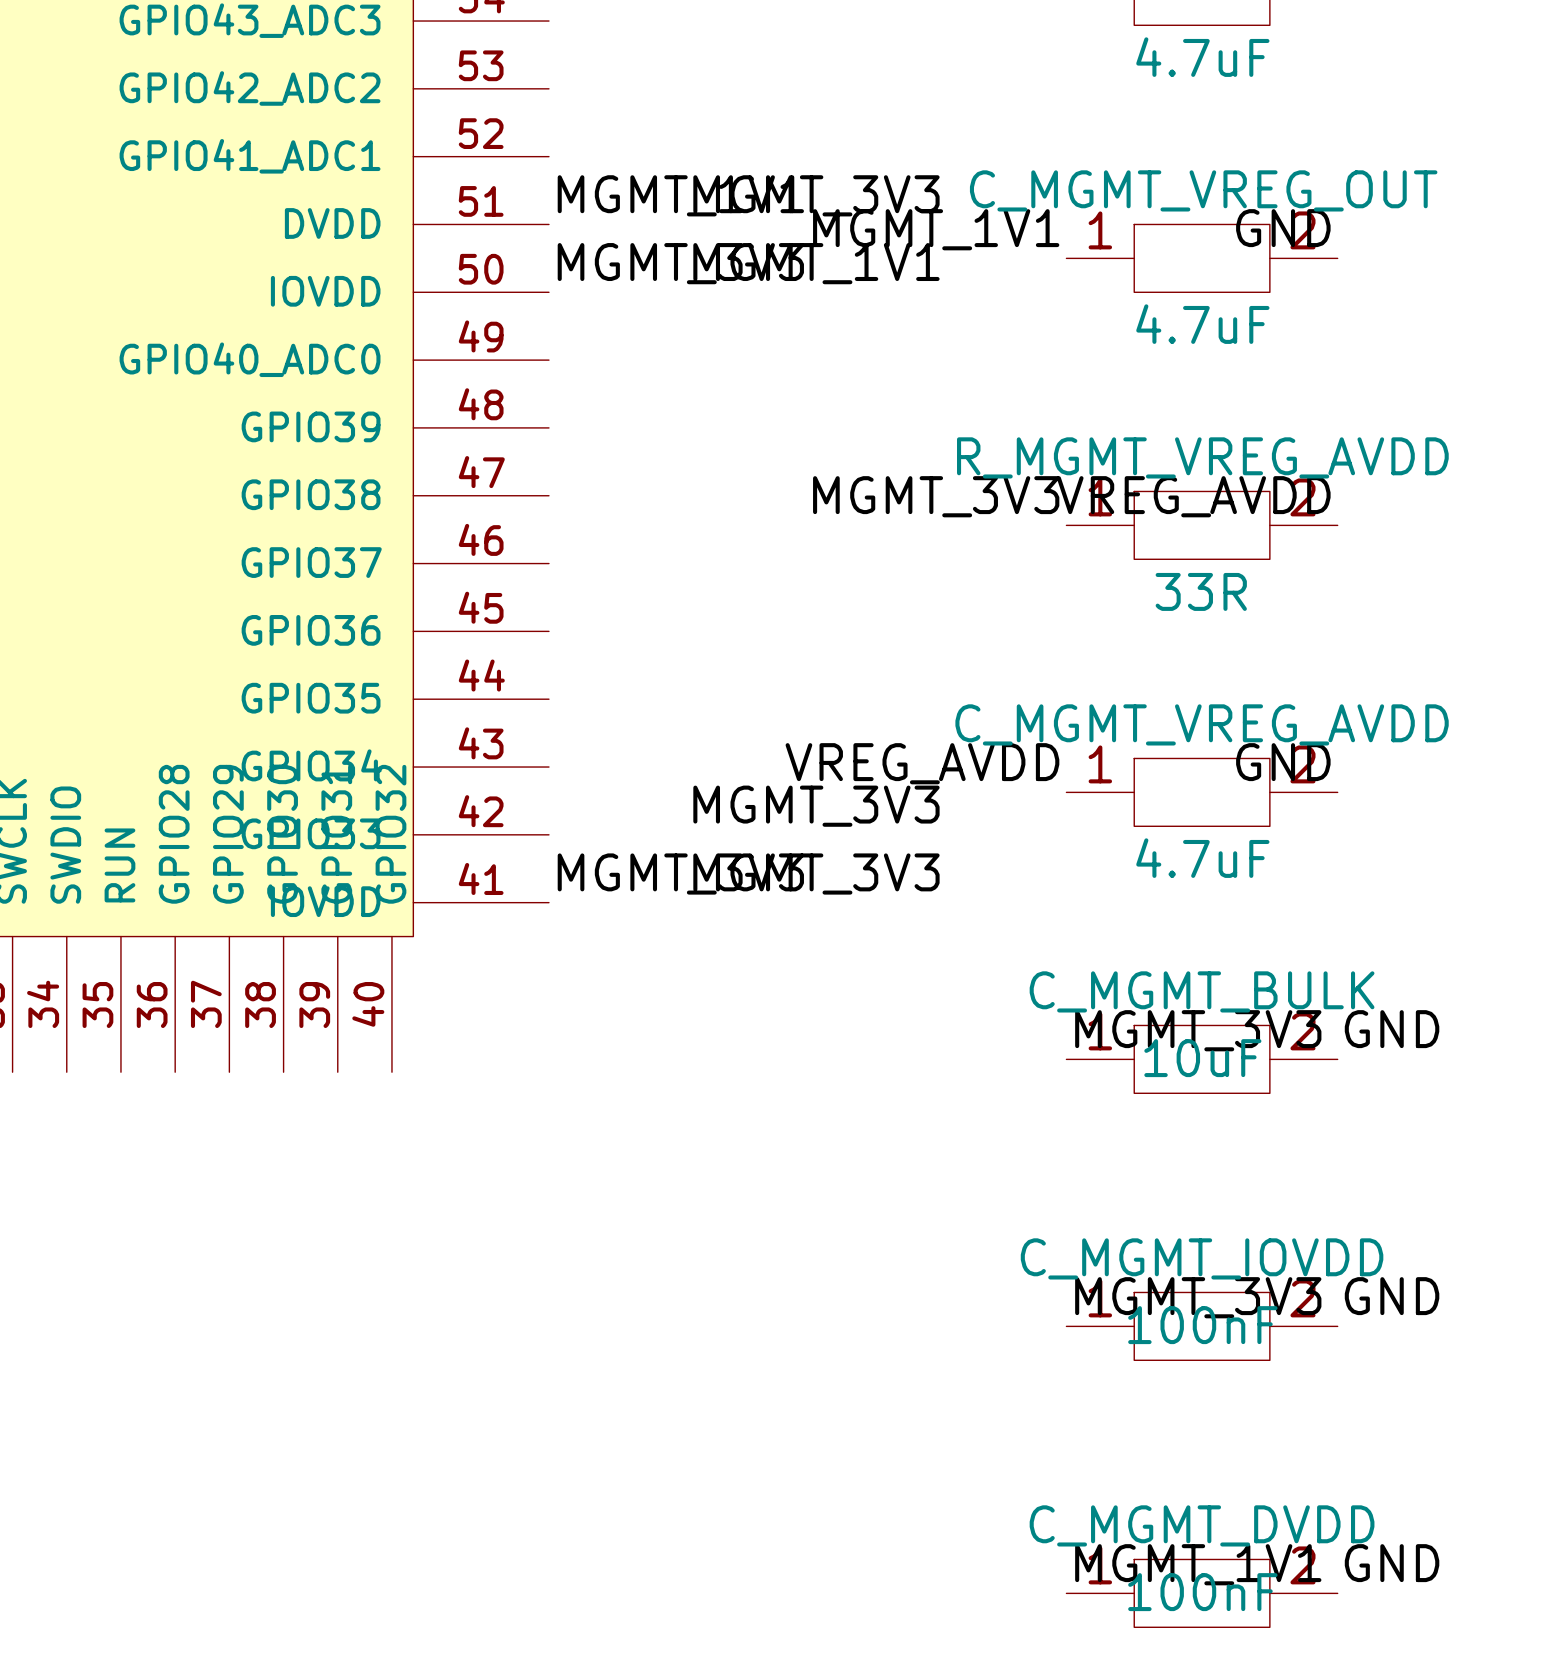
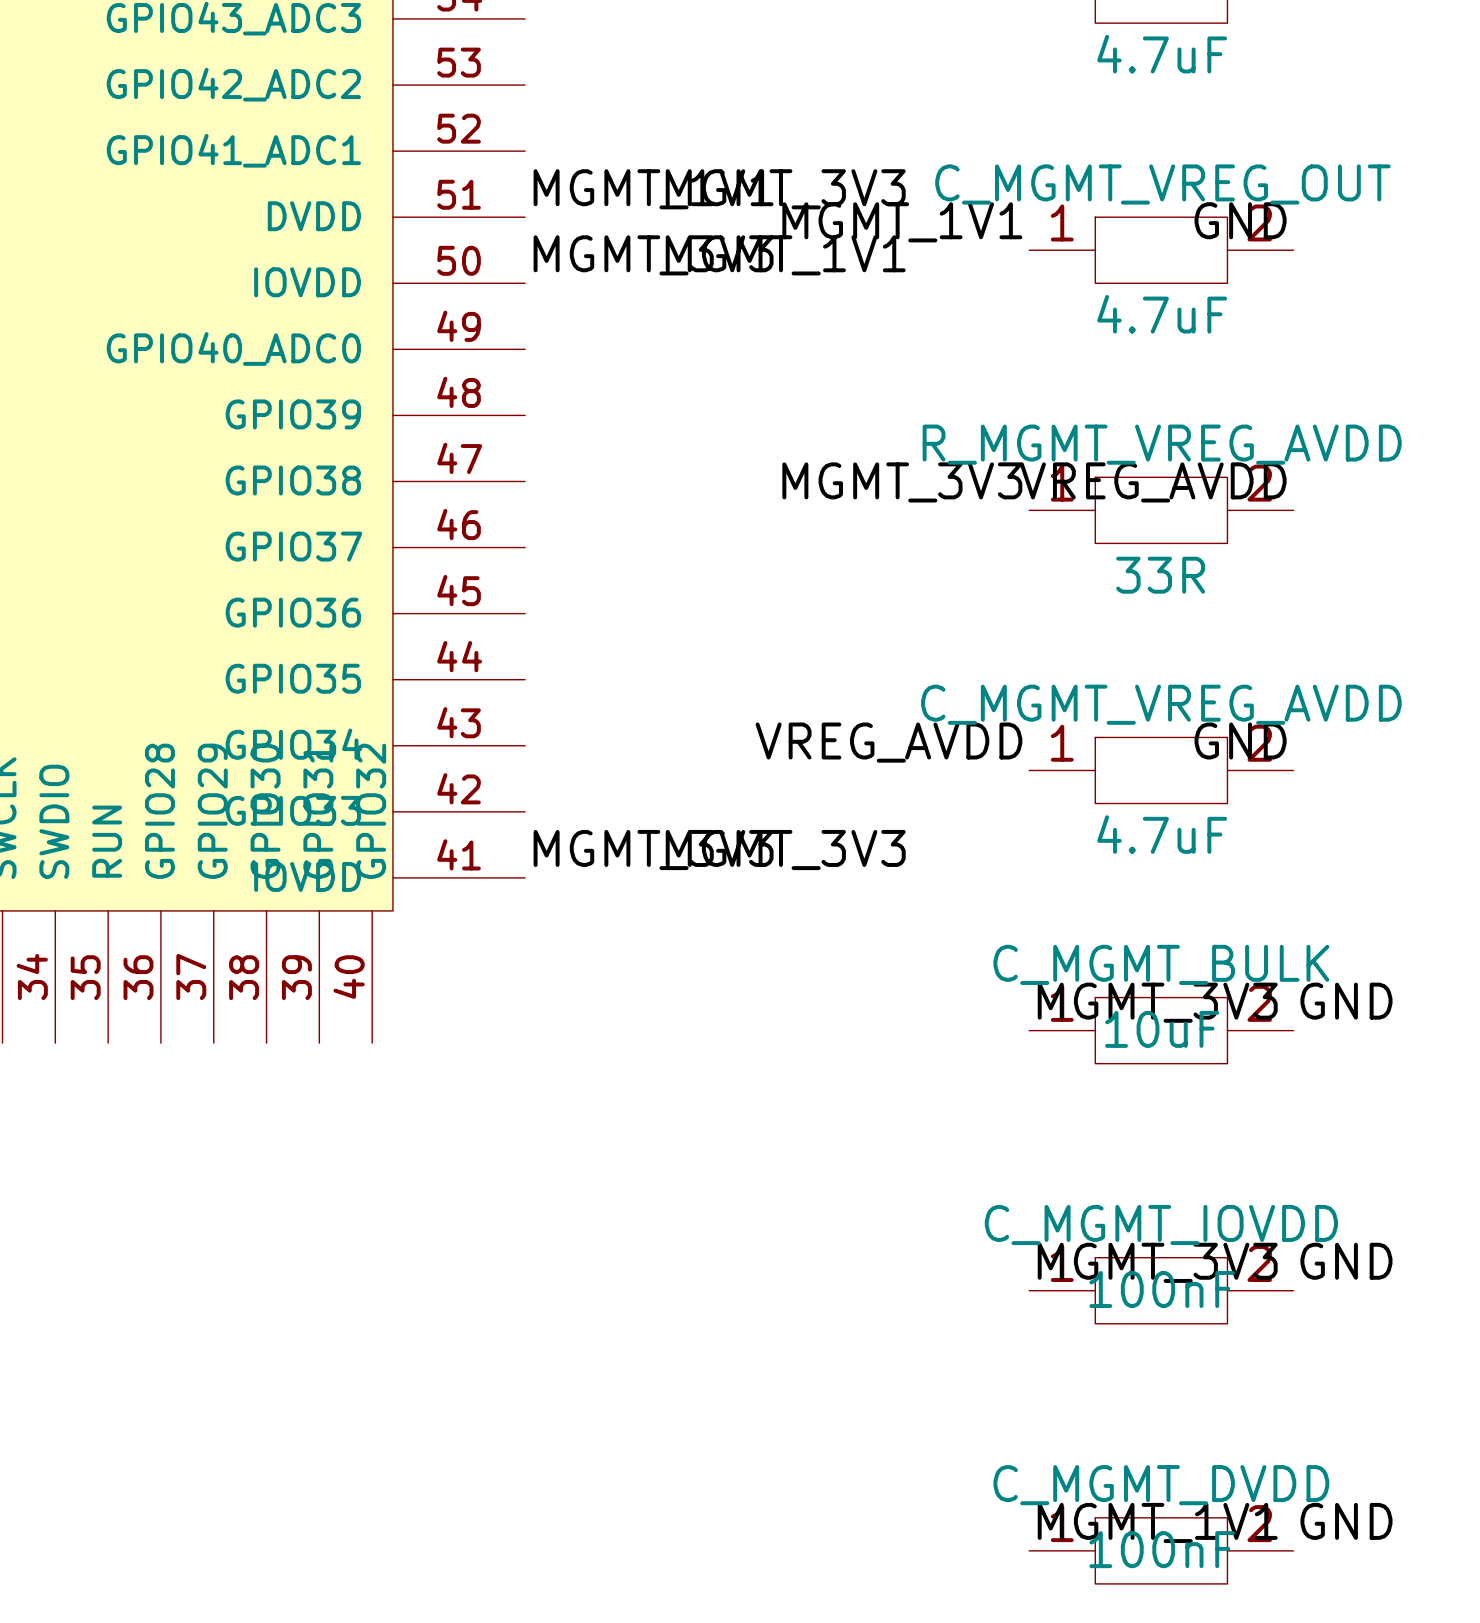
label: MGMT_3V3 (816, 806) -> none

